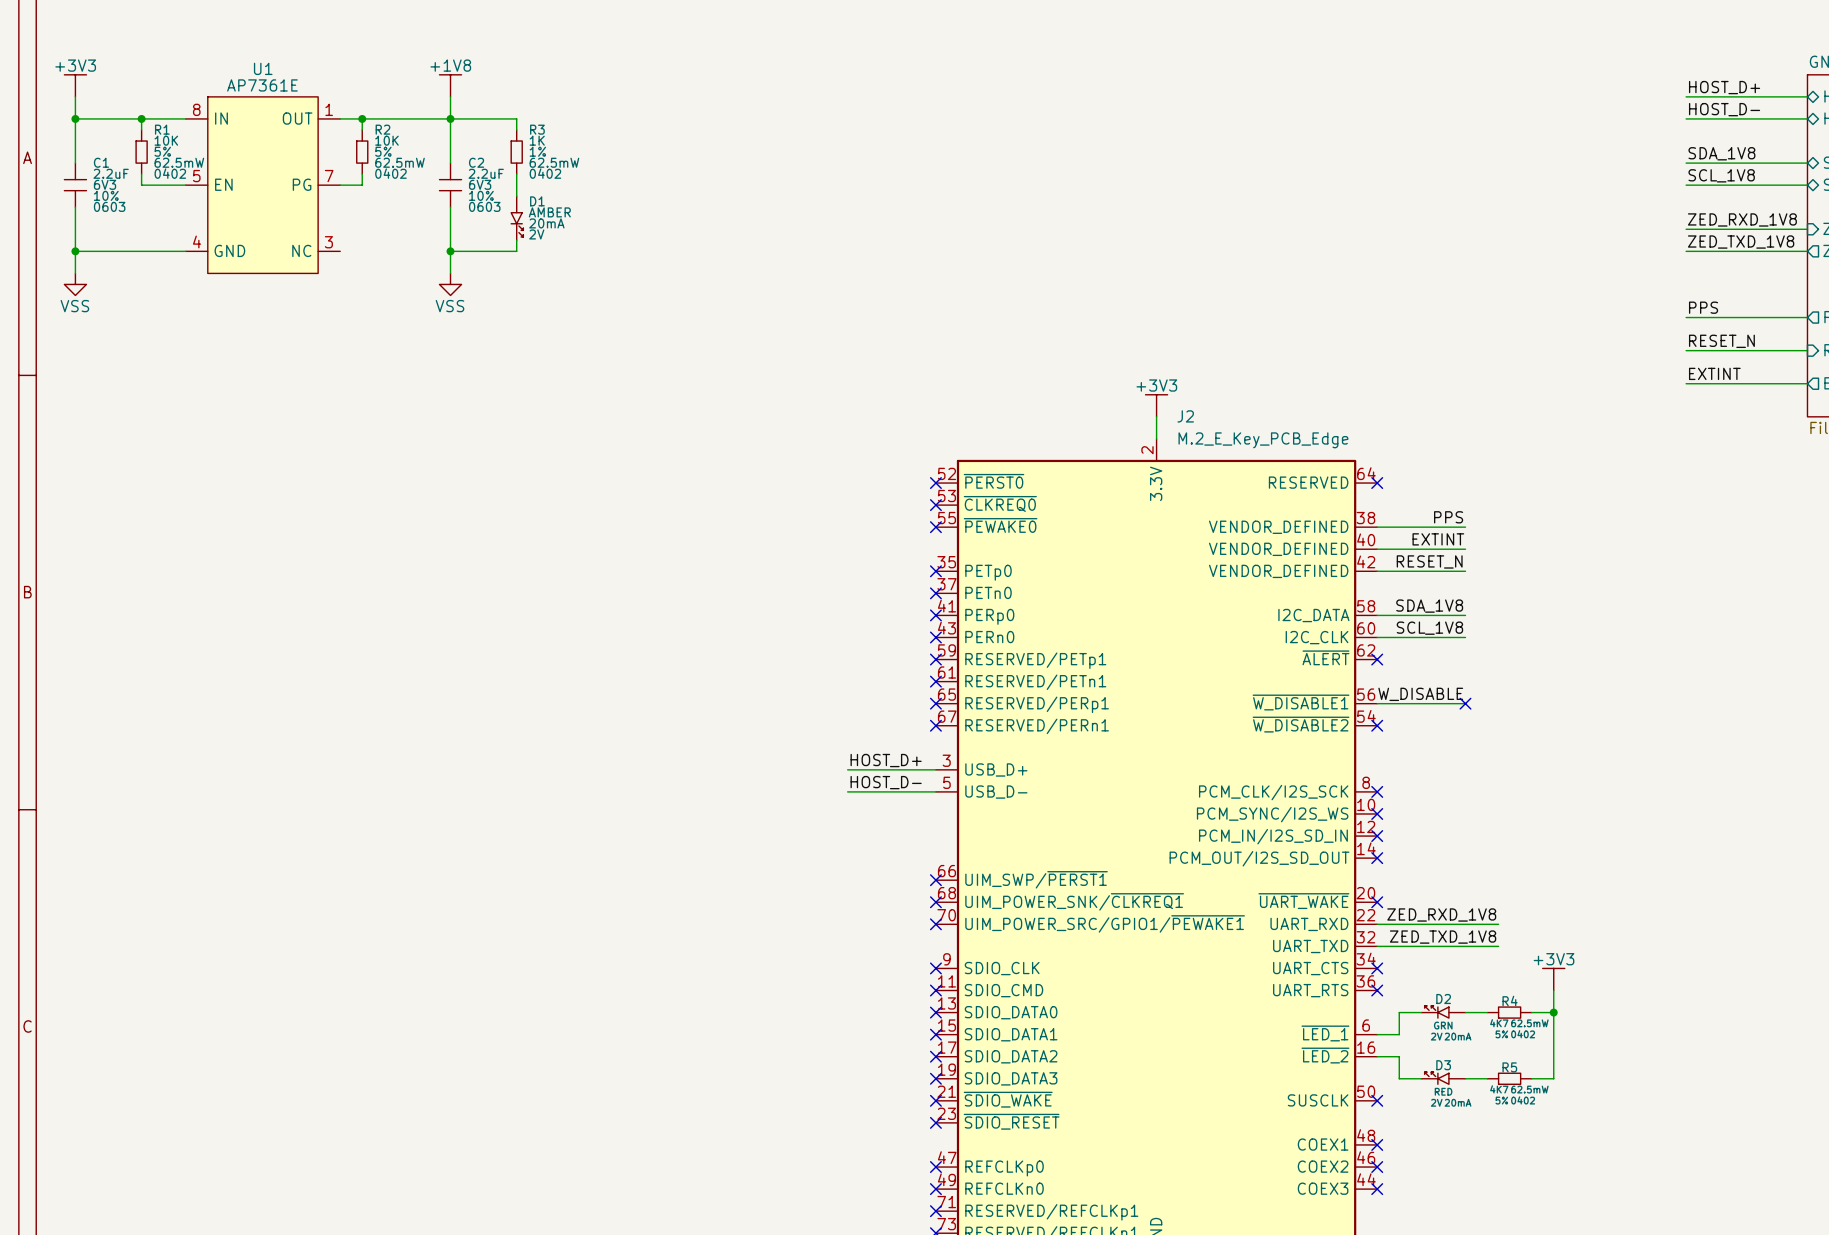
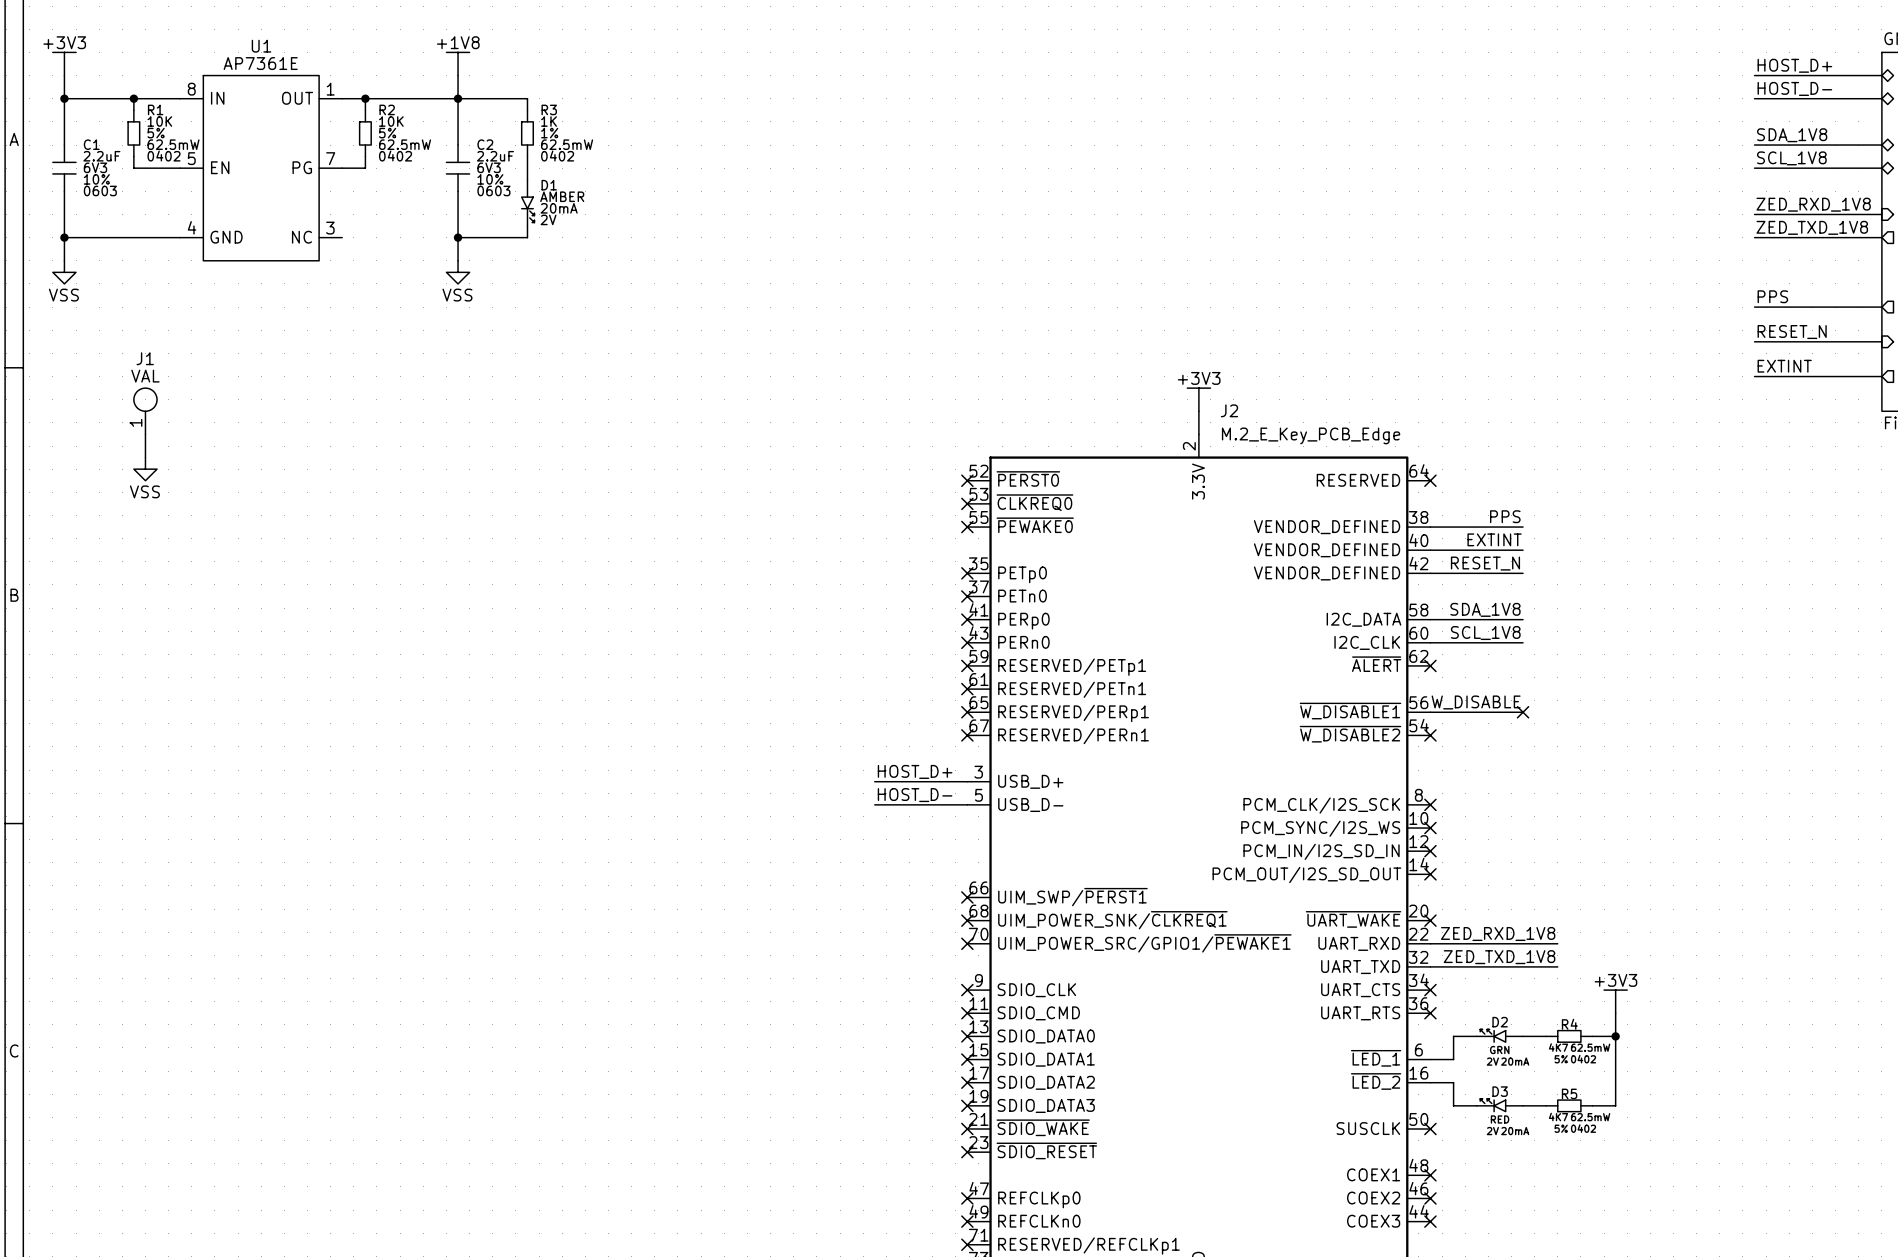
J1: none -> VAL (145, 411)
wire: none -> (145, 434) (145, 457)
power symbol: none -> VSS (145, 469)

